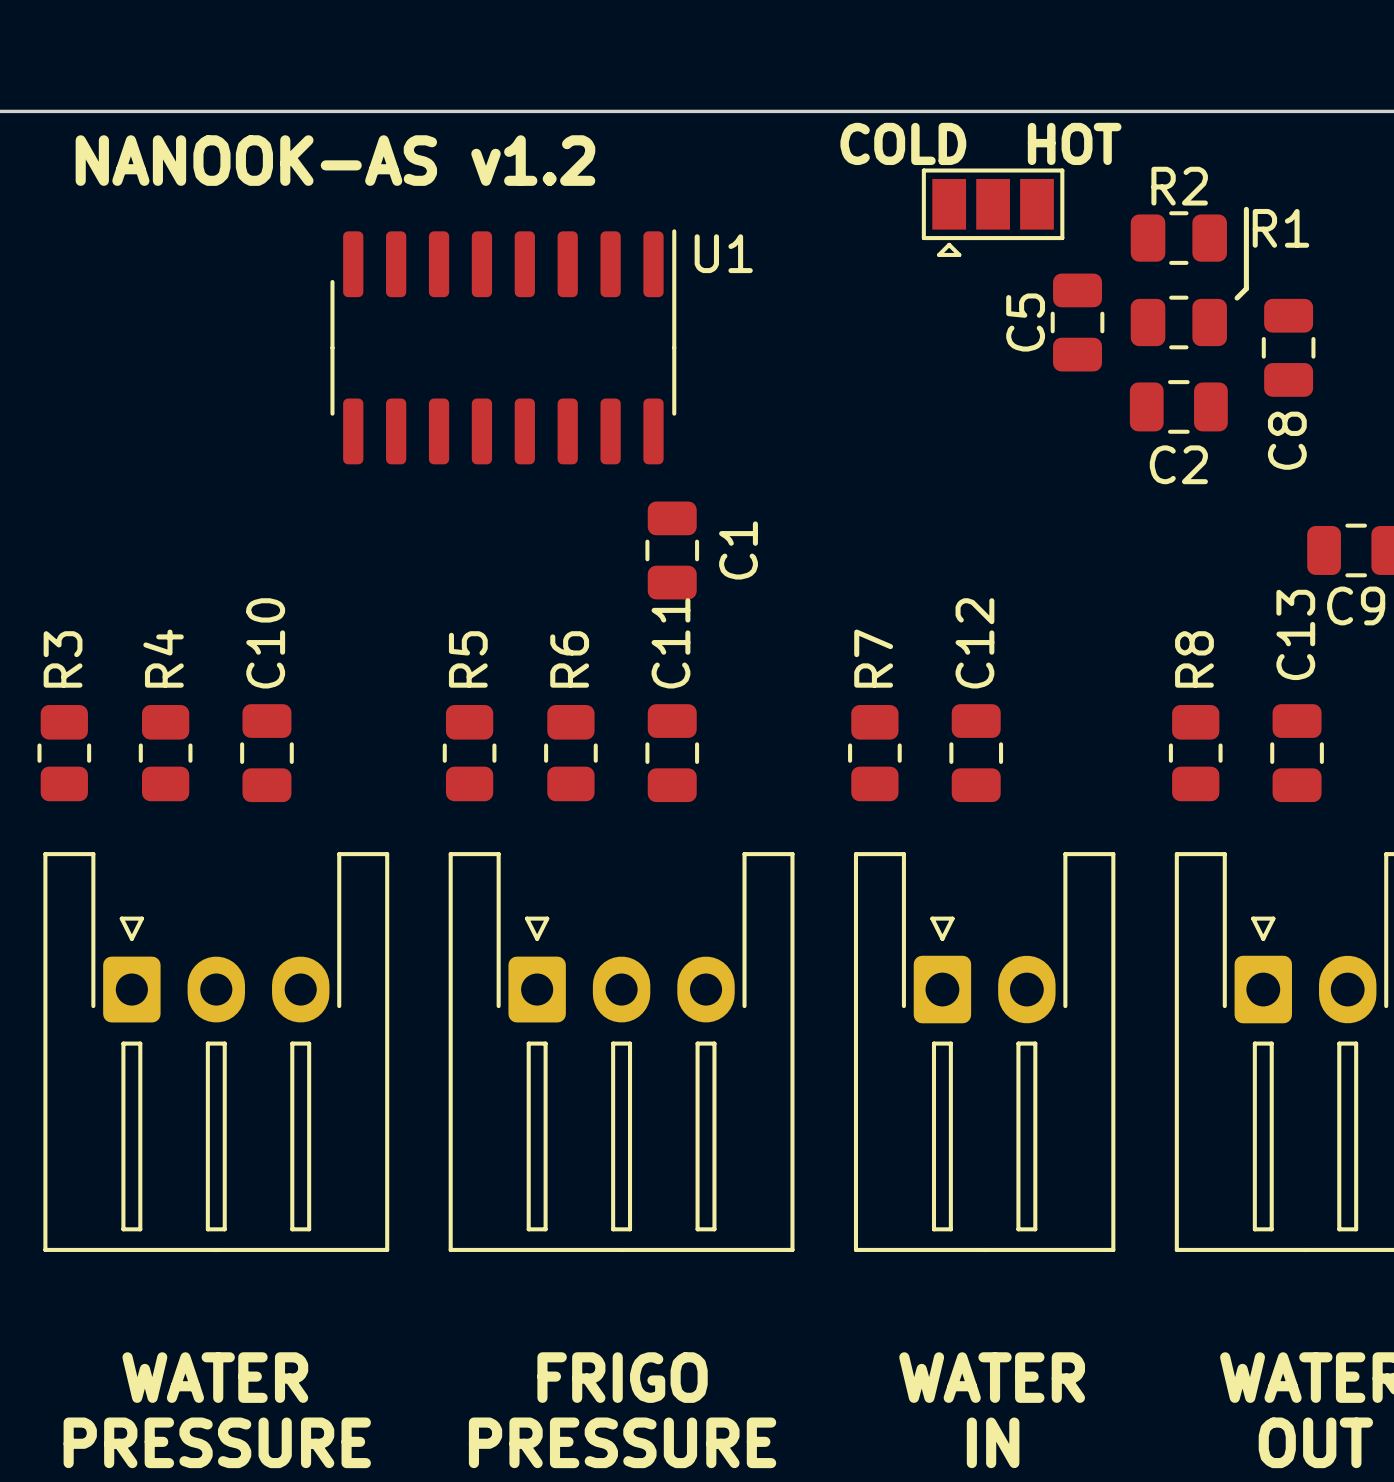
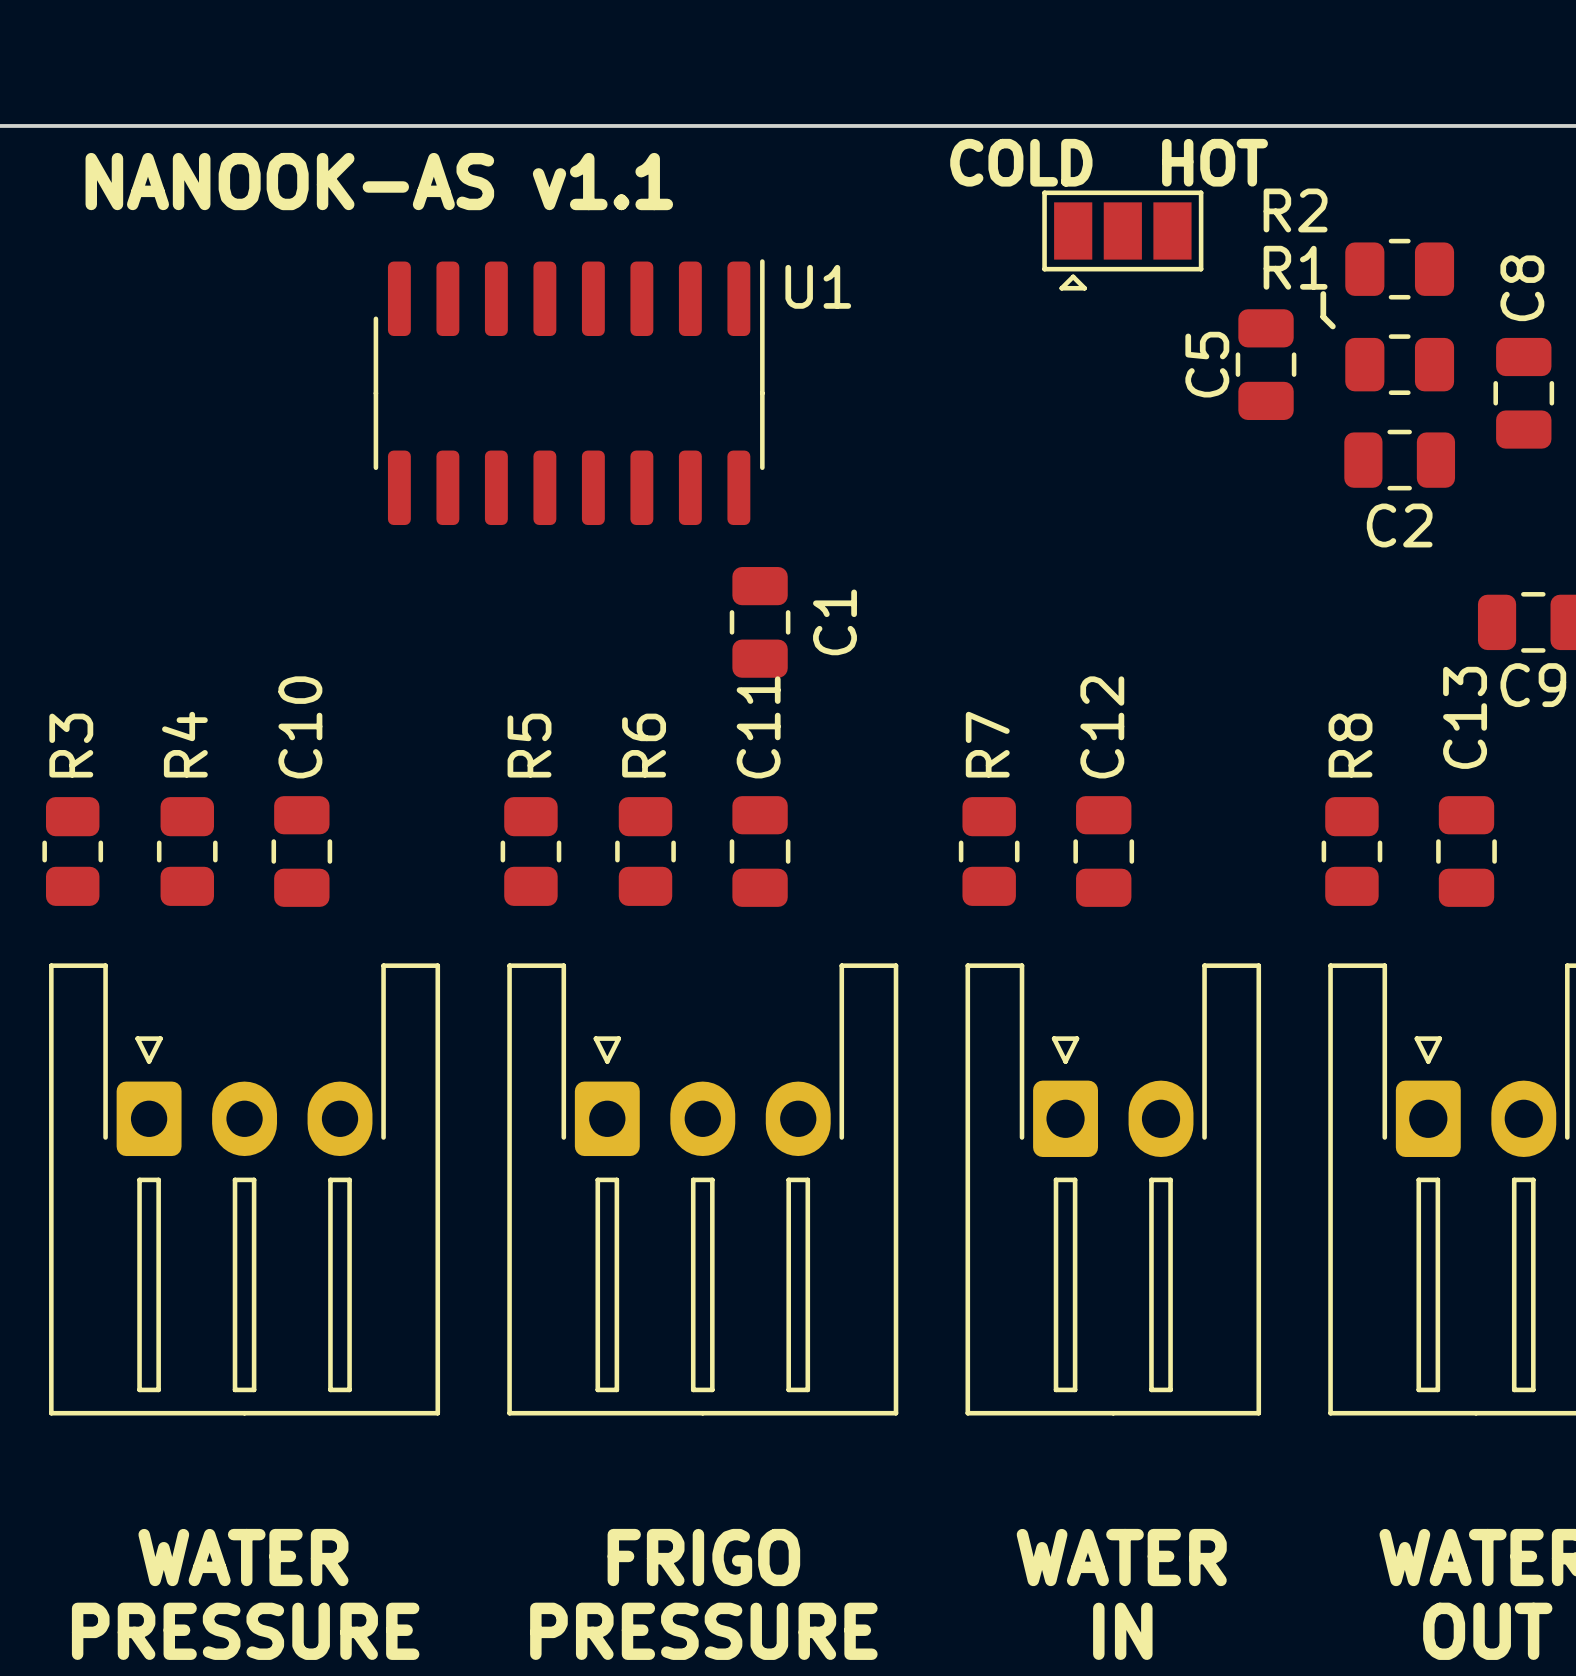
text: NANOOK-AS v1.2 (335, 160) -> NANOOK-AS v1.1 (379, 181)
R2 name position: R2 (1179, 186) -> R2 (1295, 210)
line: (1246, 209) (1246, 288) (1237, 298) -> none
R1 name position: R1 (1280, 228) -> R1 (1295, 267)
R2 position: (1178, 238) -> (1399, 269)
line: none -> (1323, 293) (1323, 316) (1332, 326)
C5 position: (1077, 322) -> (1266, 364)
R1 position: (1178, 322) -> (1399, 364)
C8 position: (1288, 347) -> (1523, 393)
C2 position: (1178, 406) -> (1399, 460)
C8 name position: C8 (1287, 440) -> C8 (1522, 288)

